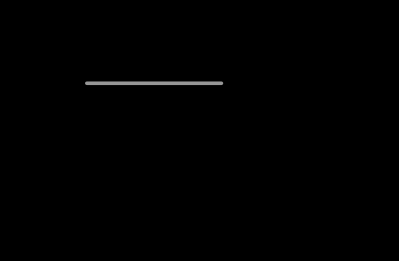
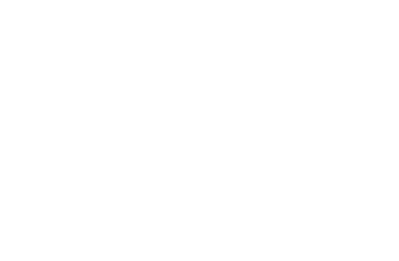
line: (221, 83) (86, 83) -> none

